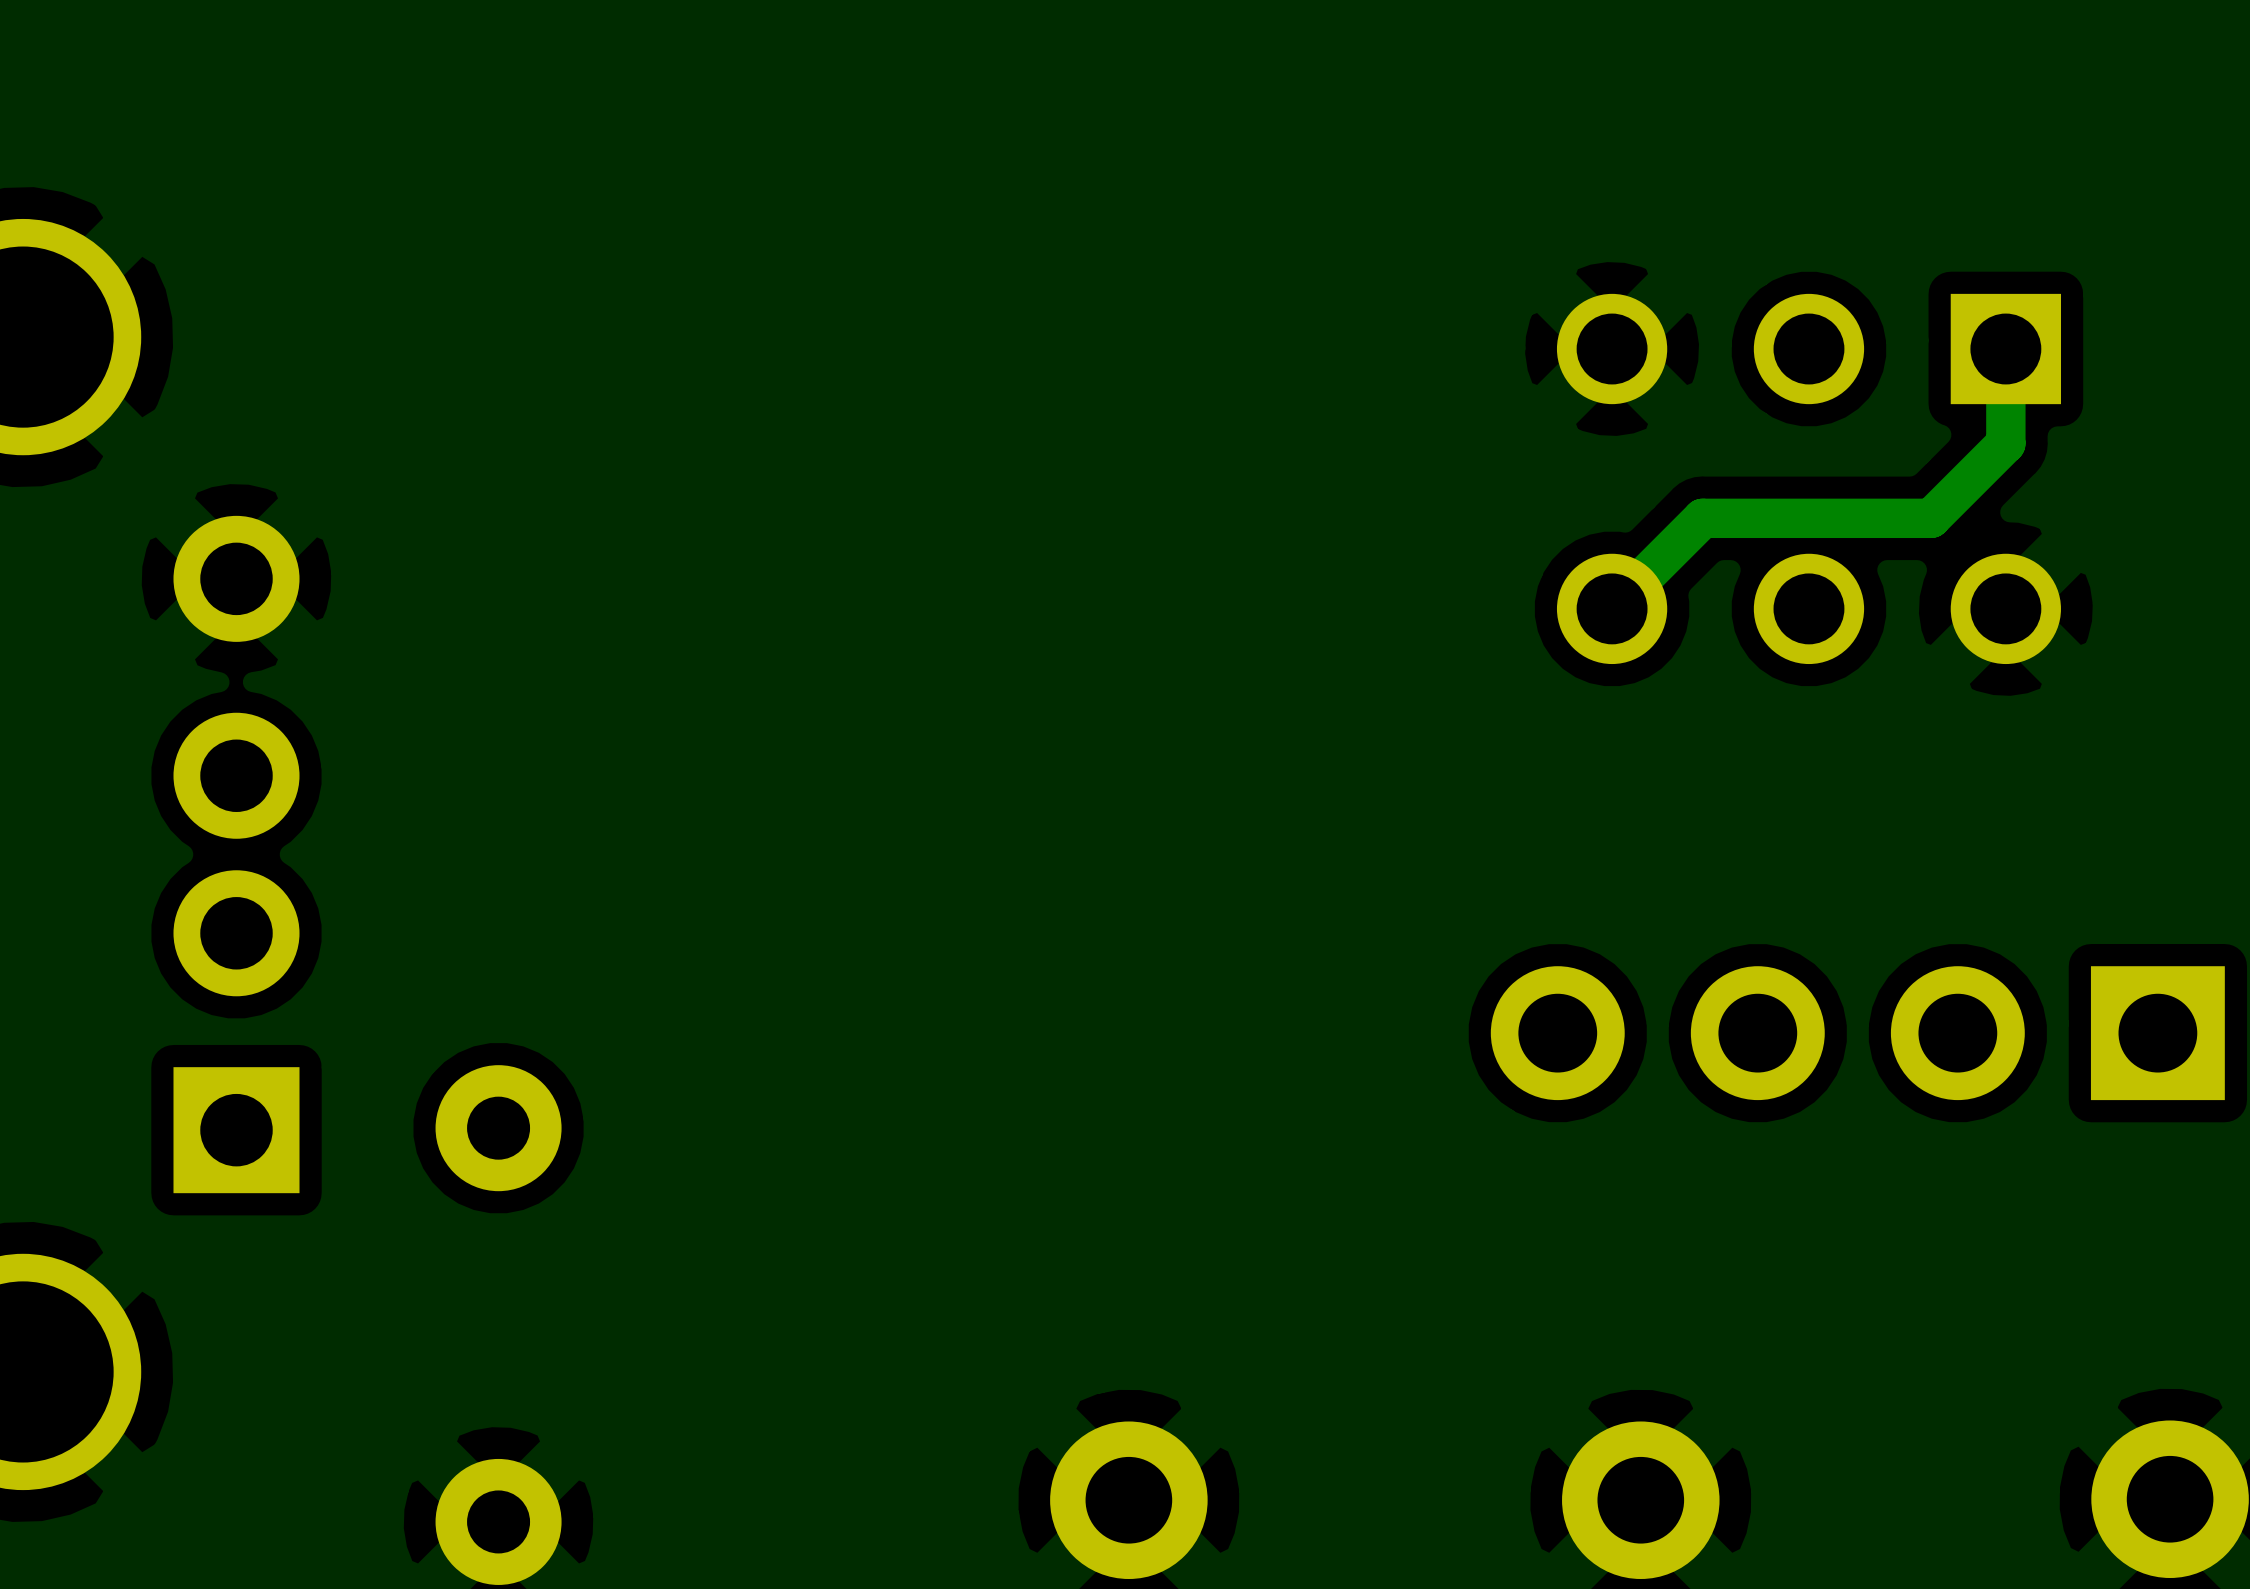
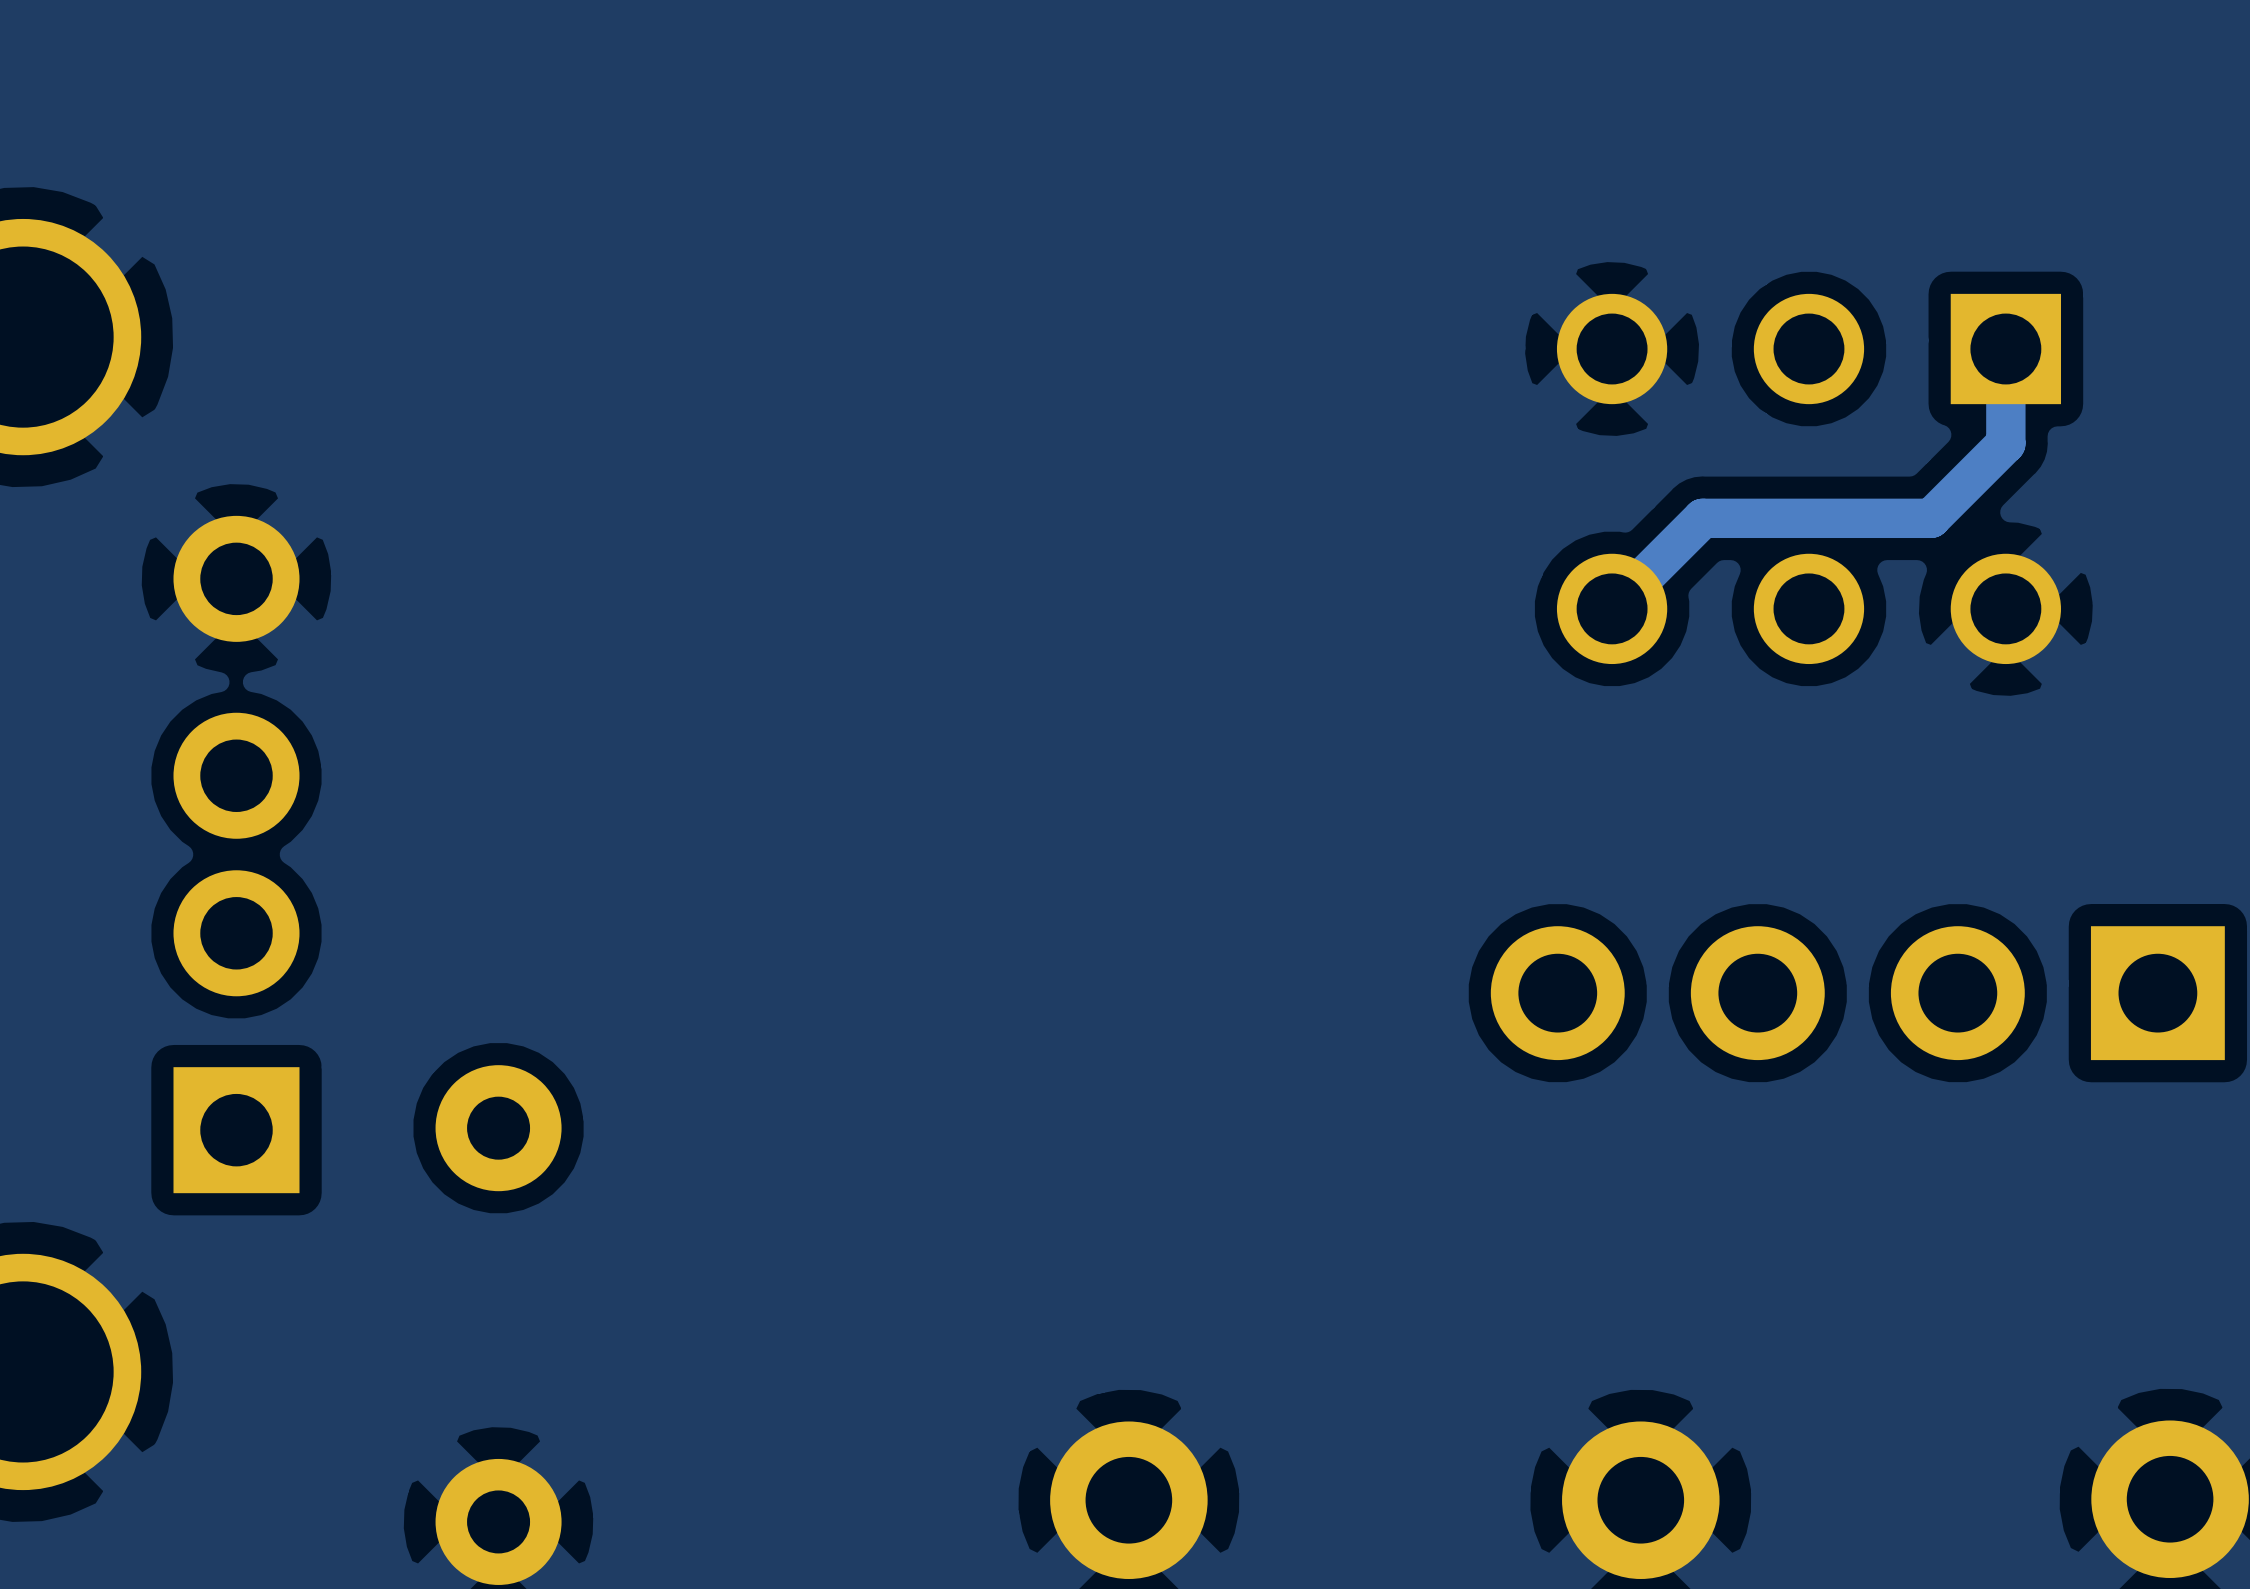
part position: (1857, 1033) -> (1857, 993)

